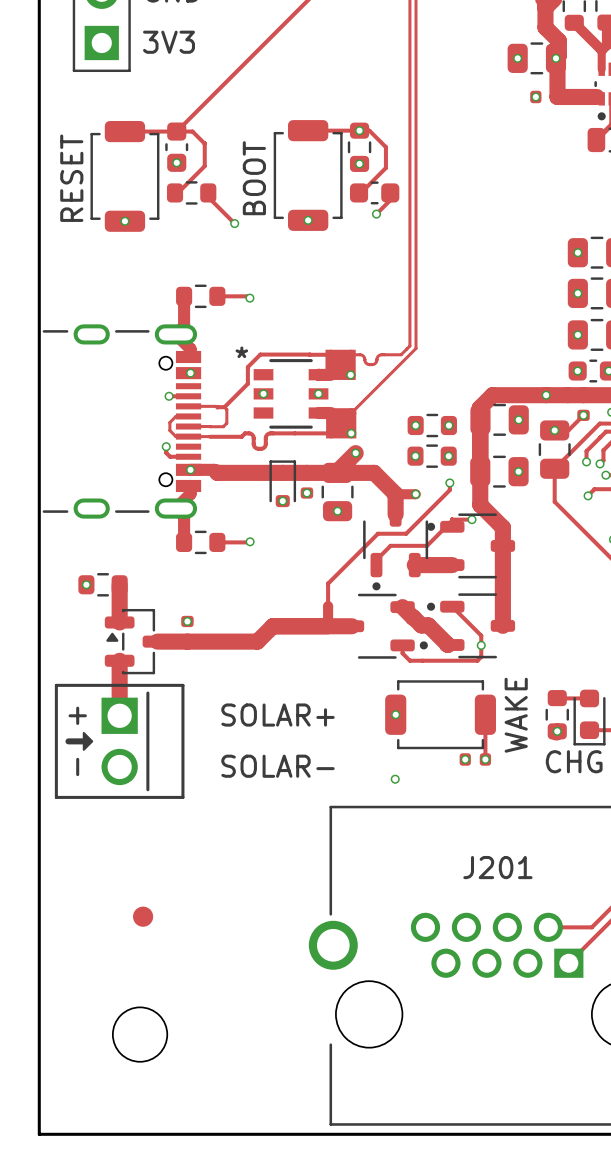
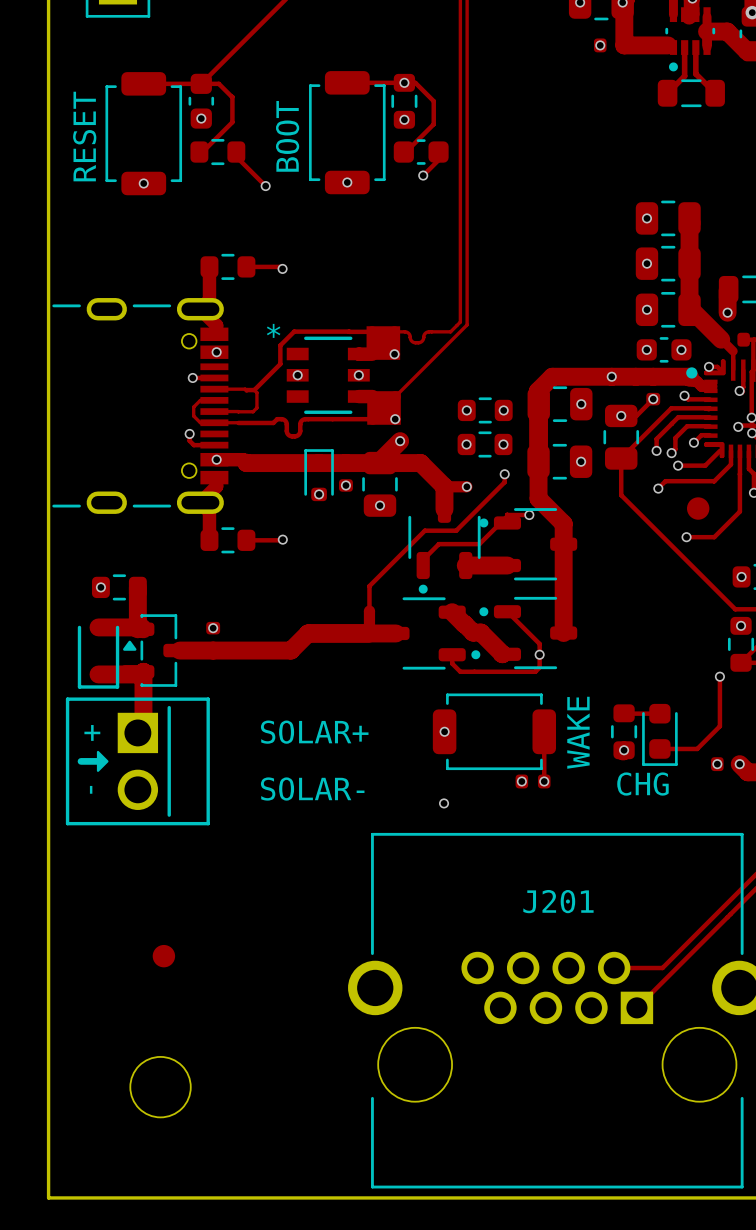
track: none -> (98, 627) (141, 627) (143, 629)
part: none -> (98, 654)
track: (119, 660) (119, 715) -> (98, 674) (140, 674) (143, 671) (143, 727) (137, 732)

